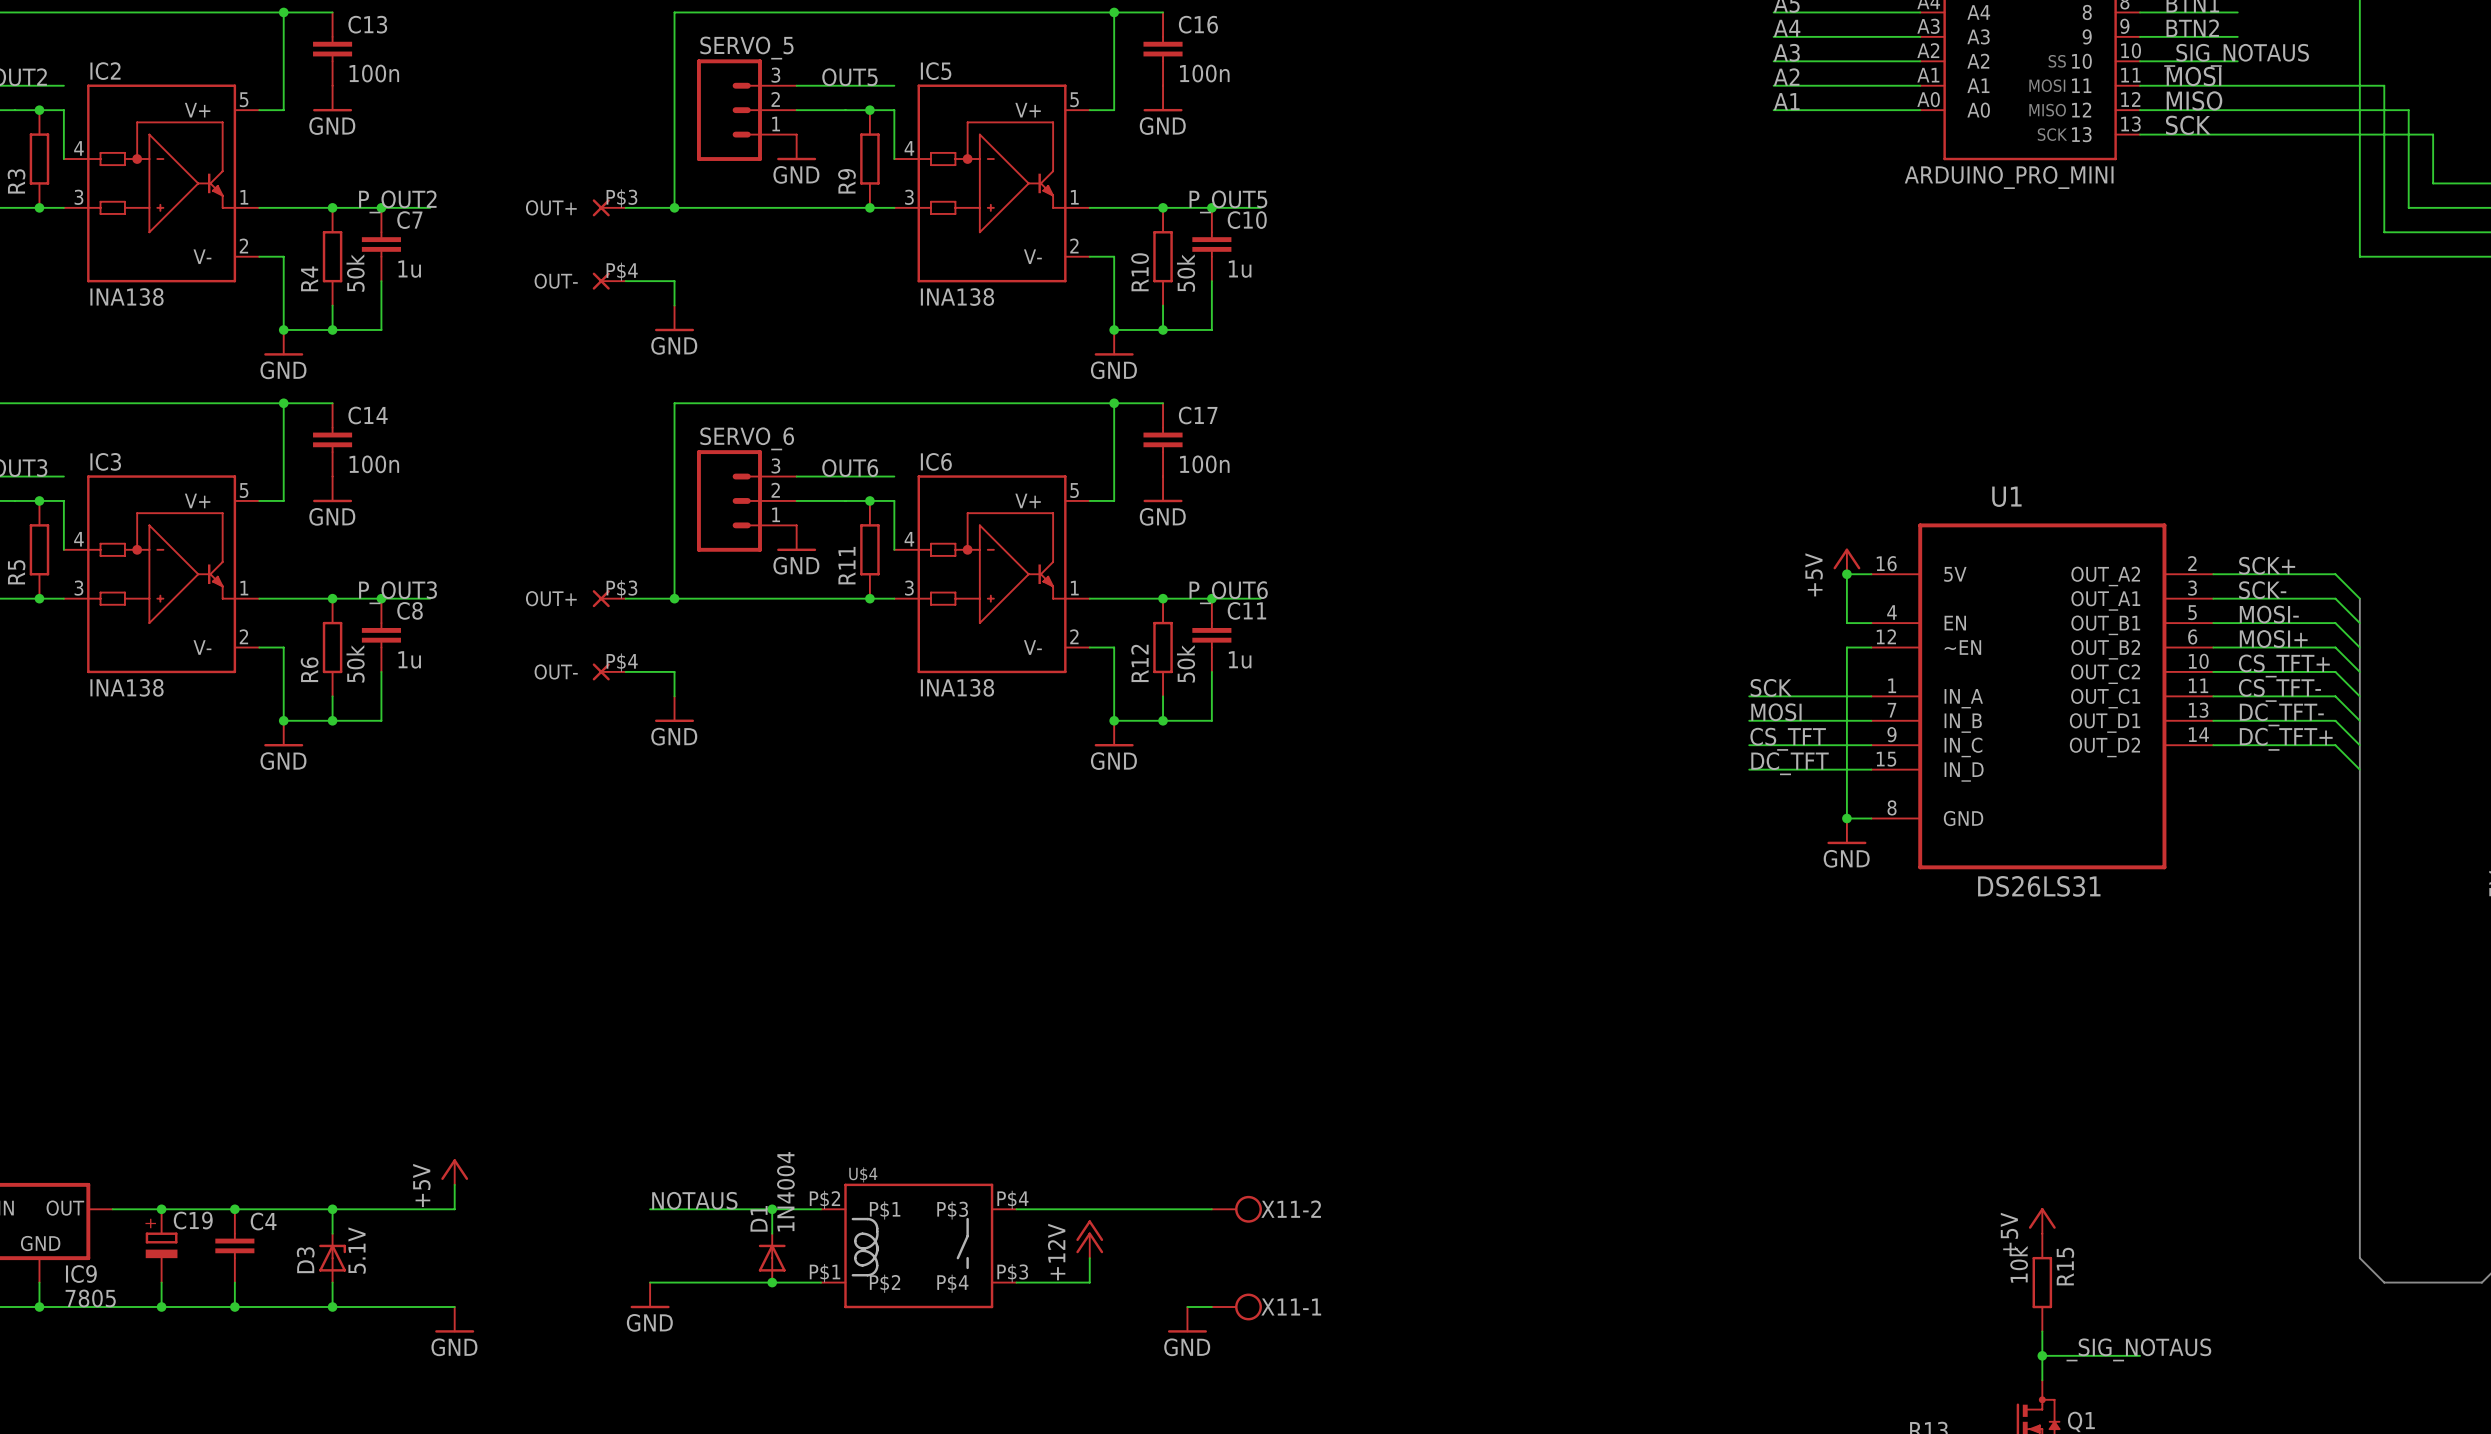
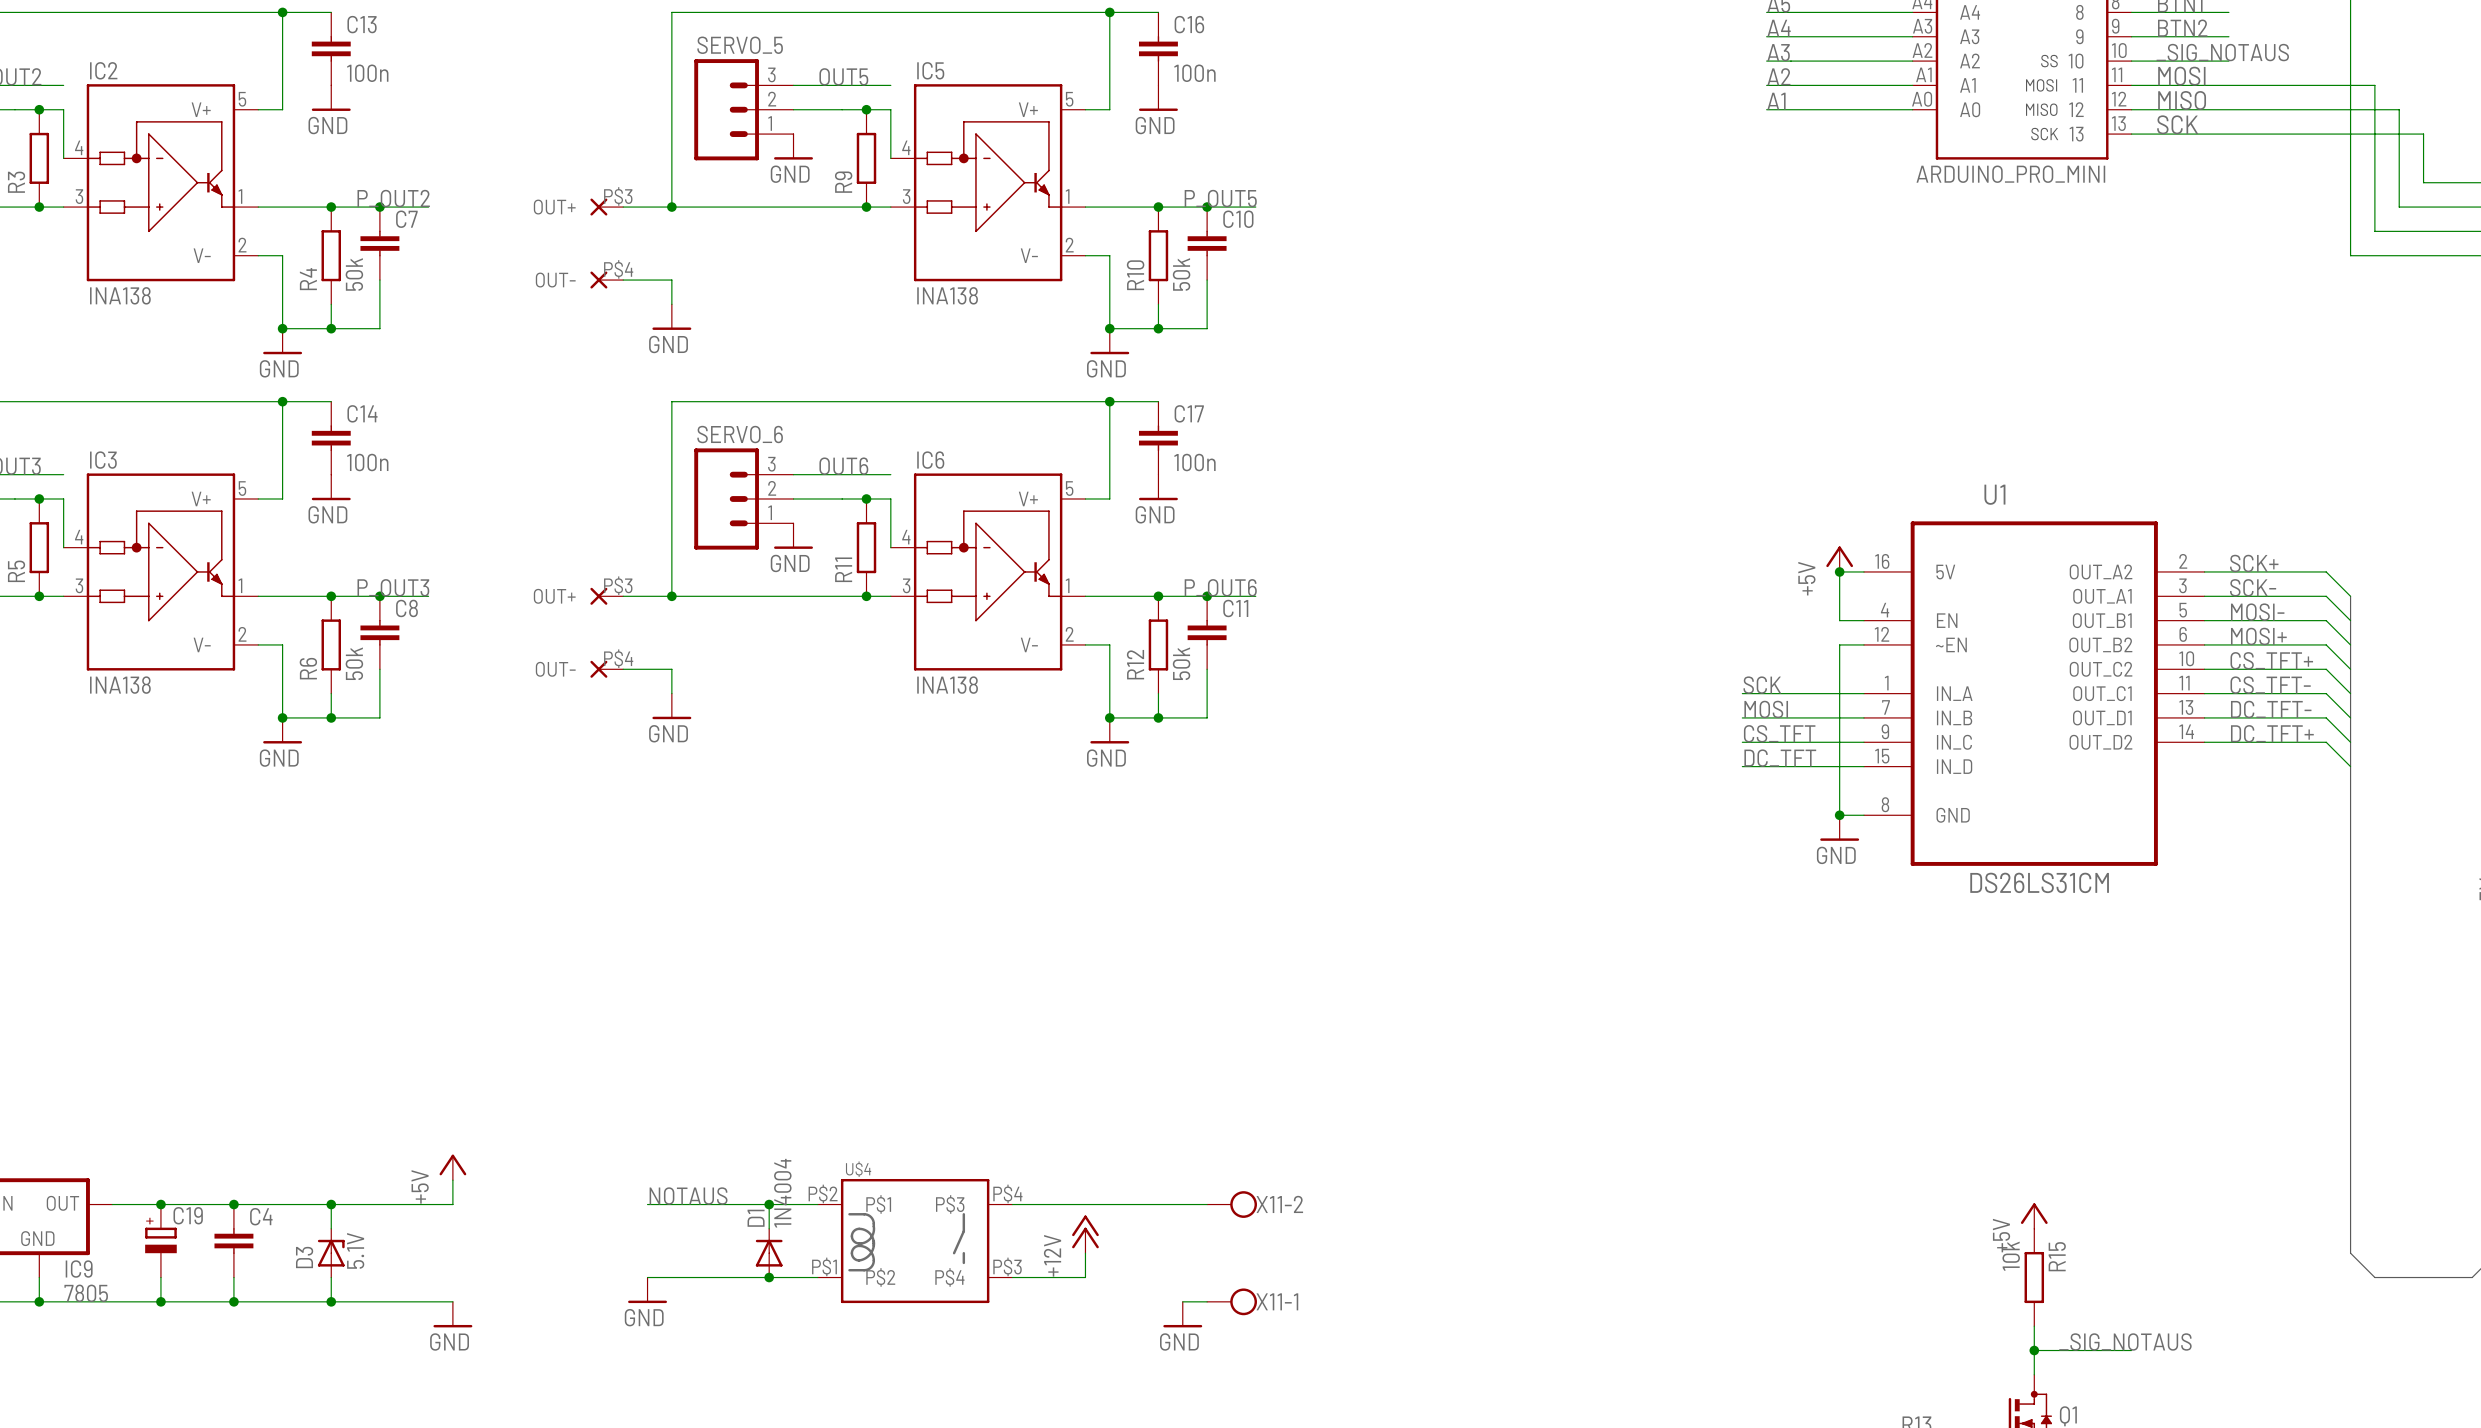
C7 value: 1u (409, 269) -> none
C10 value: 1u (1240, 269) -> none
C8 value: 1u (409, 659) -> none
C11 value: 1u (1240, 659) -> none
U1 value: DS26LS31 (2039, 886) -> DS26LS31CM (2039, 882)

